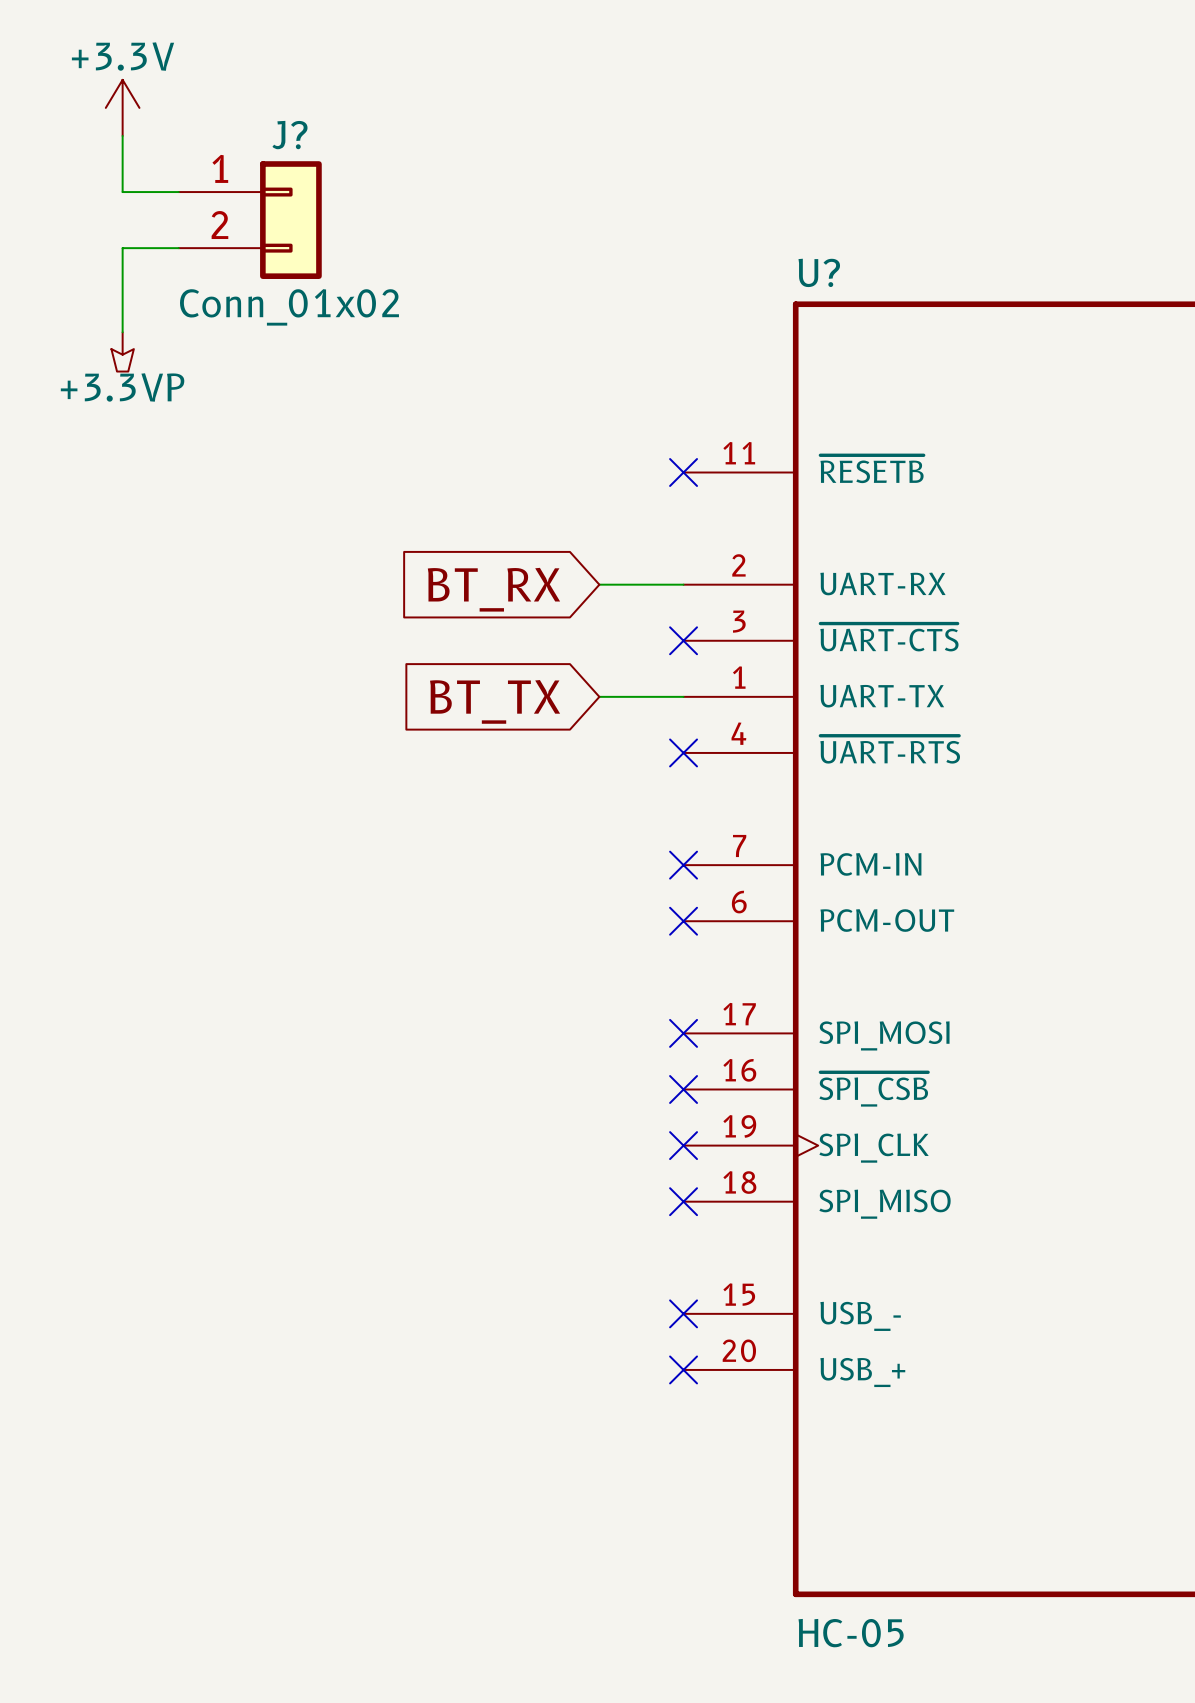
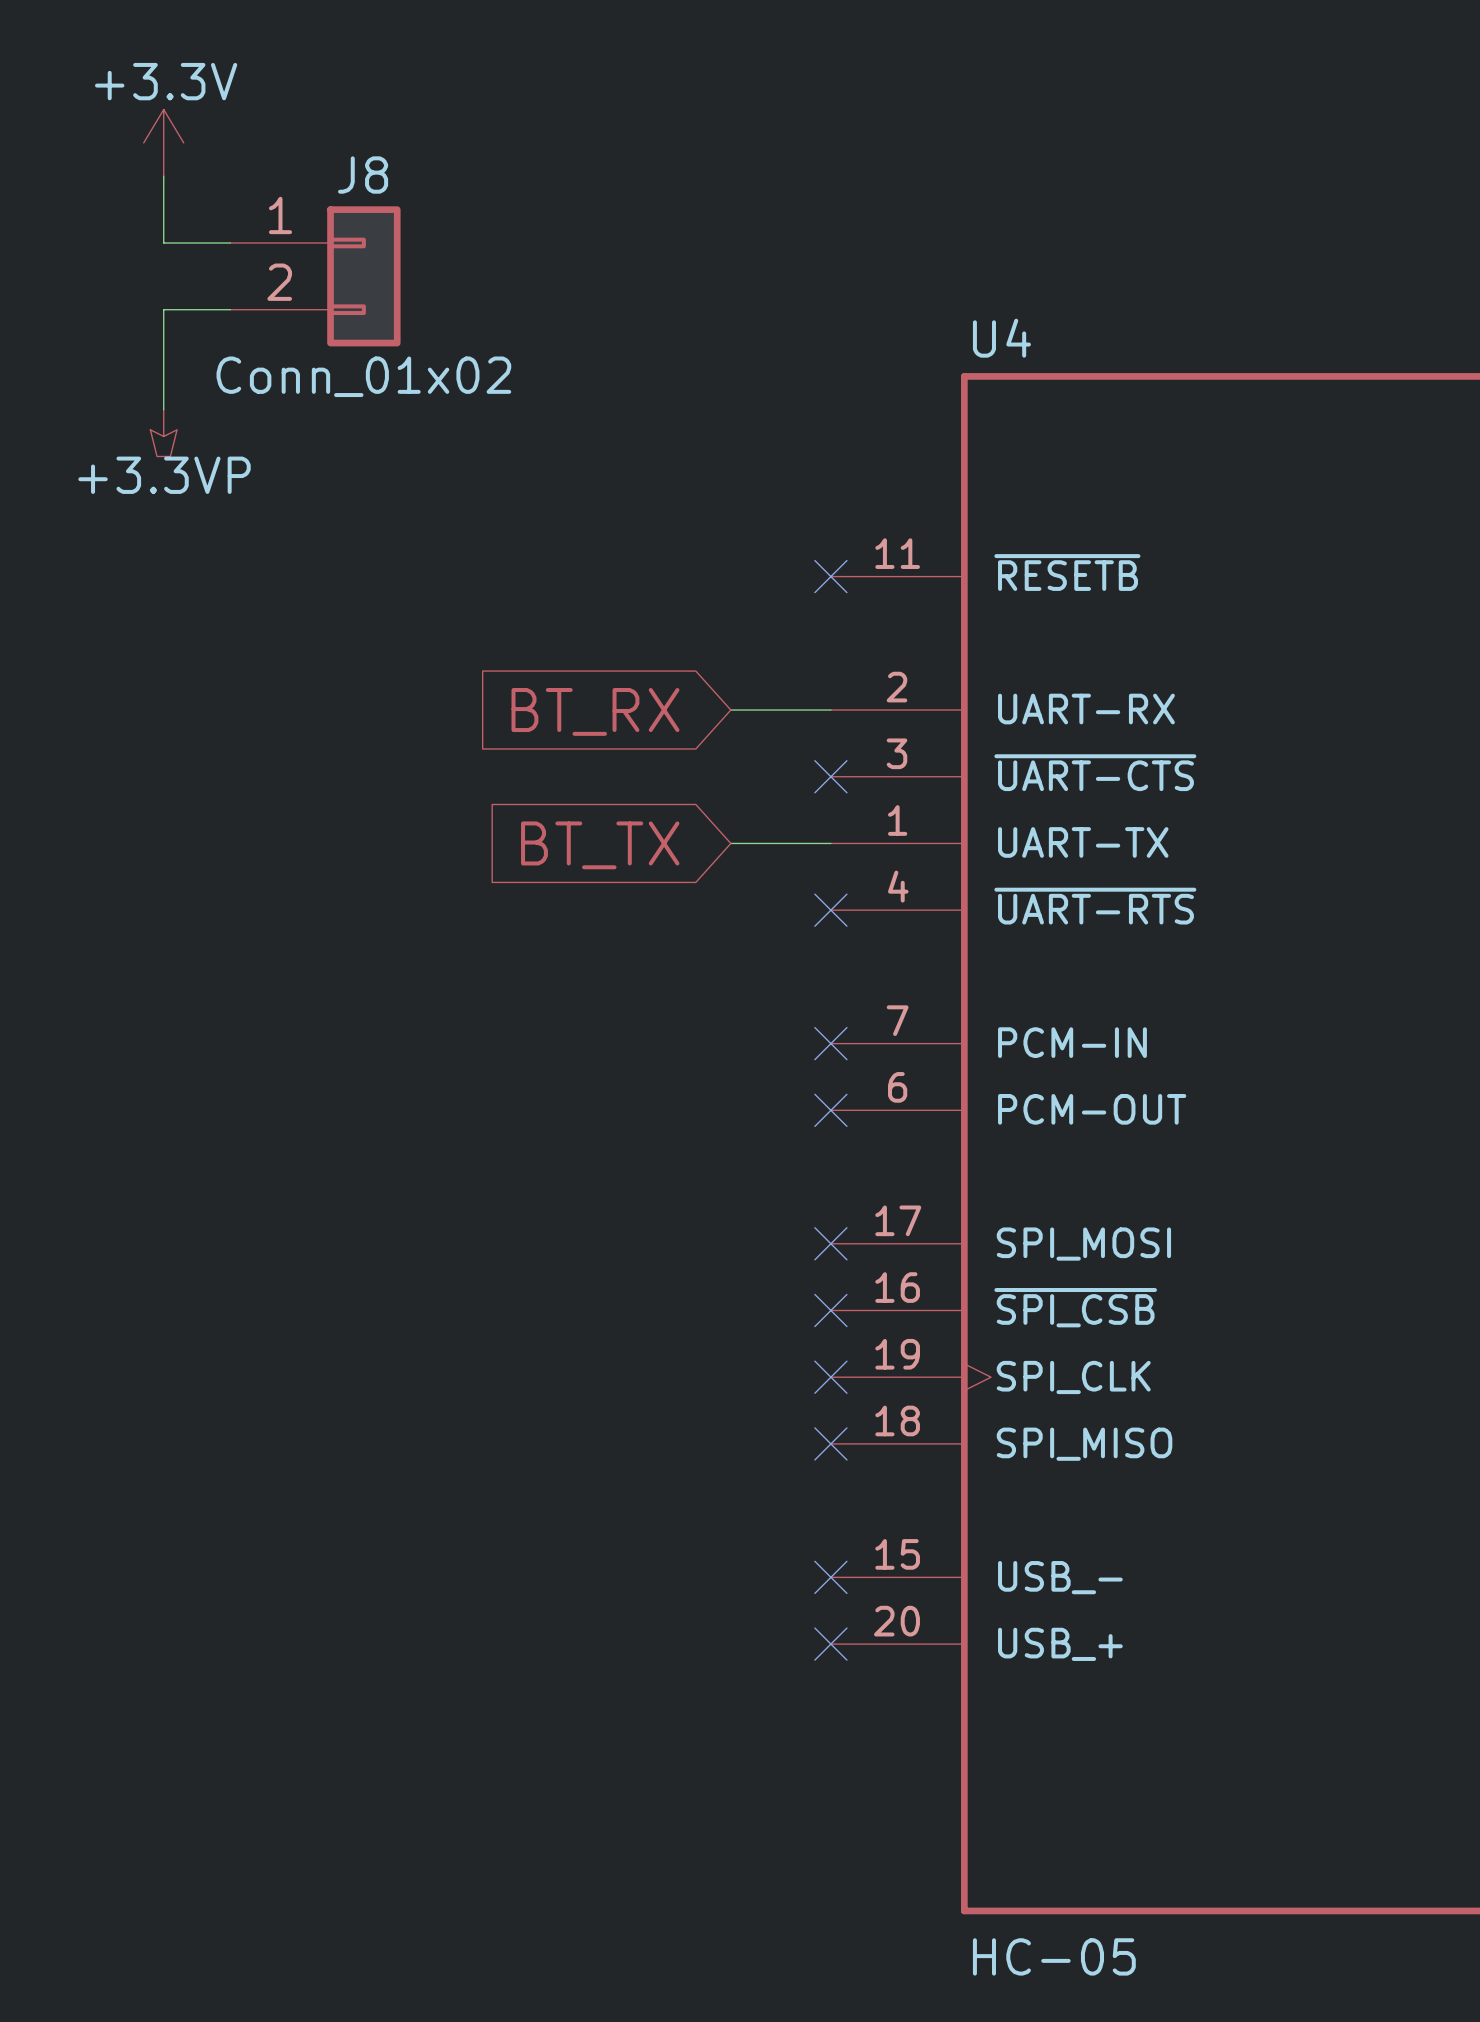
J? name: J? (289, 135) -> J8 (363, 175)
U? name: U? (819, 272) -> U4 (1001, 338)

